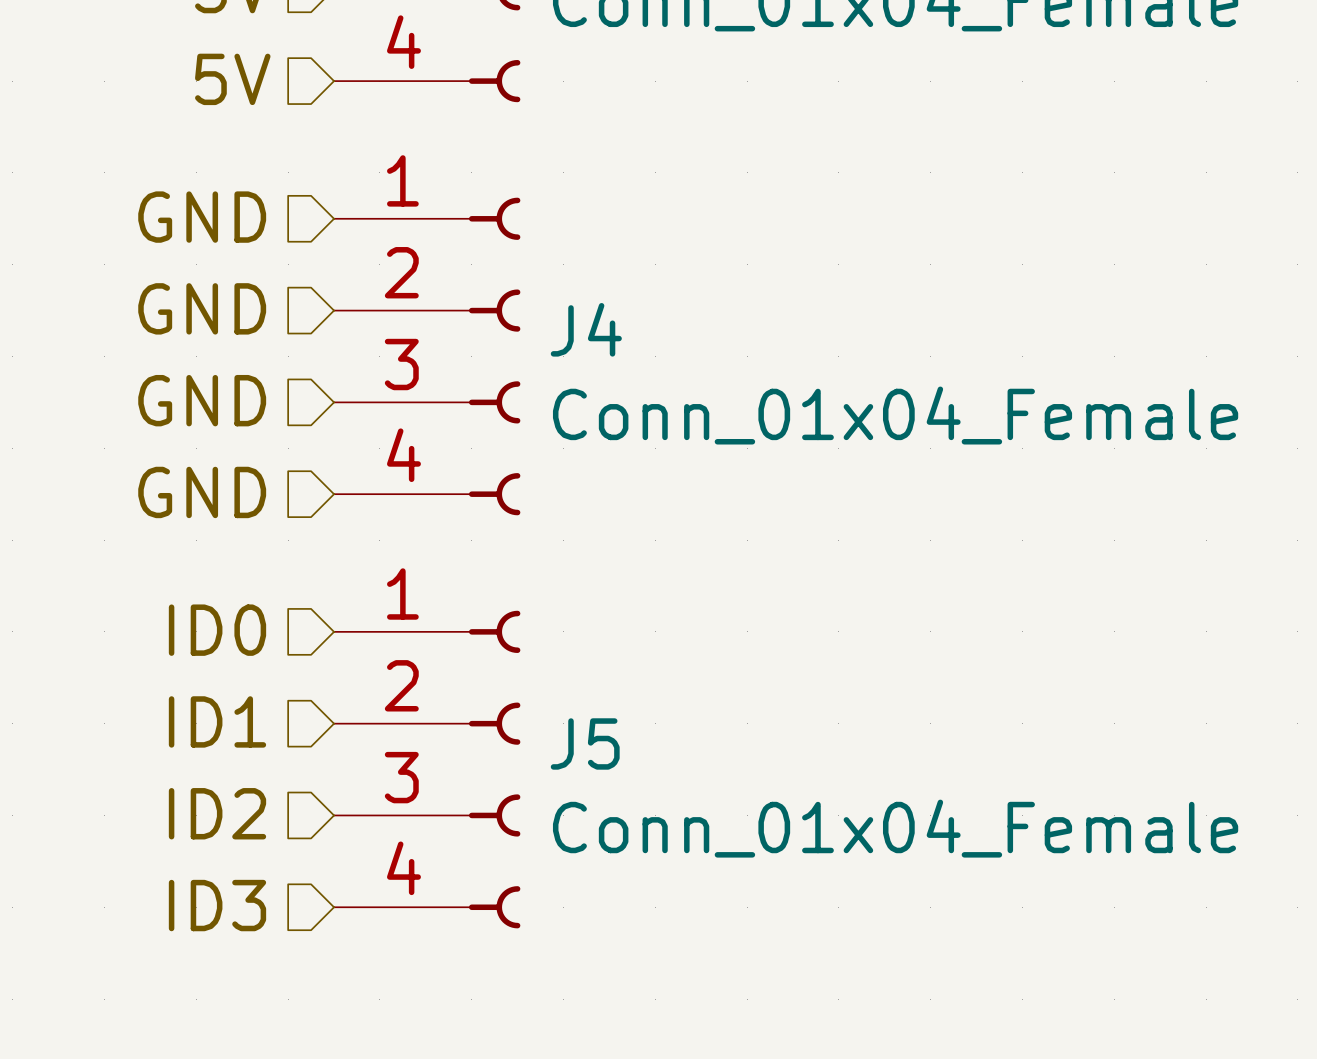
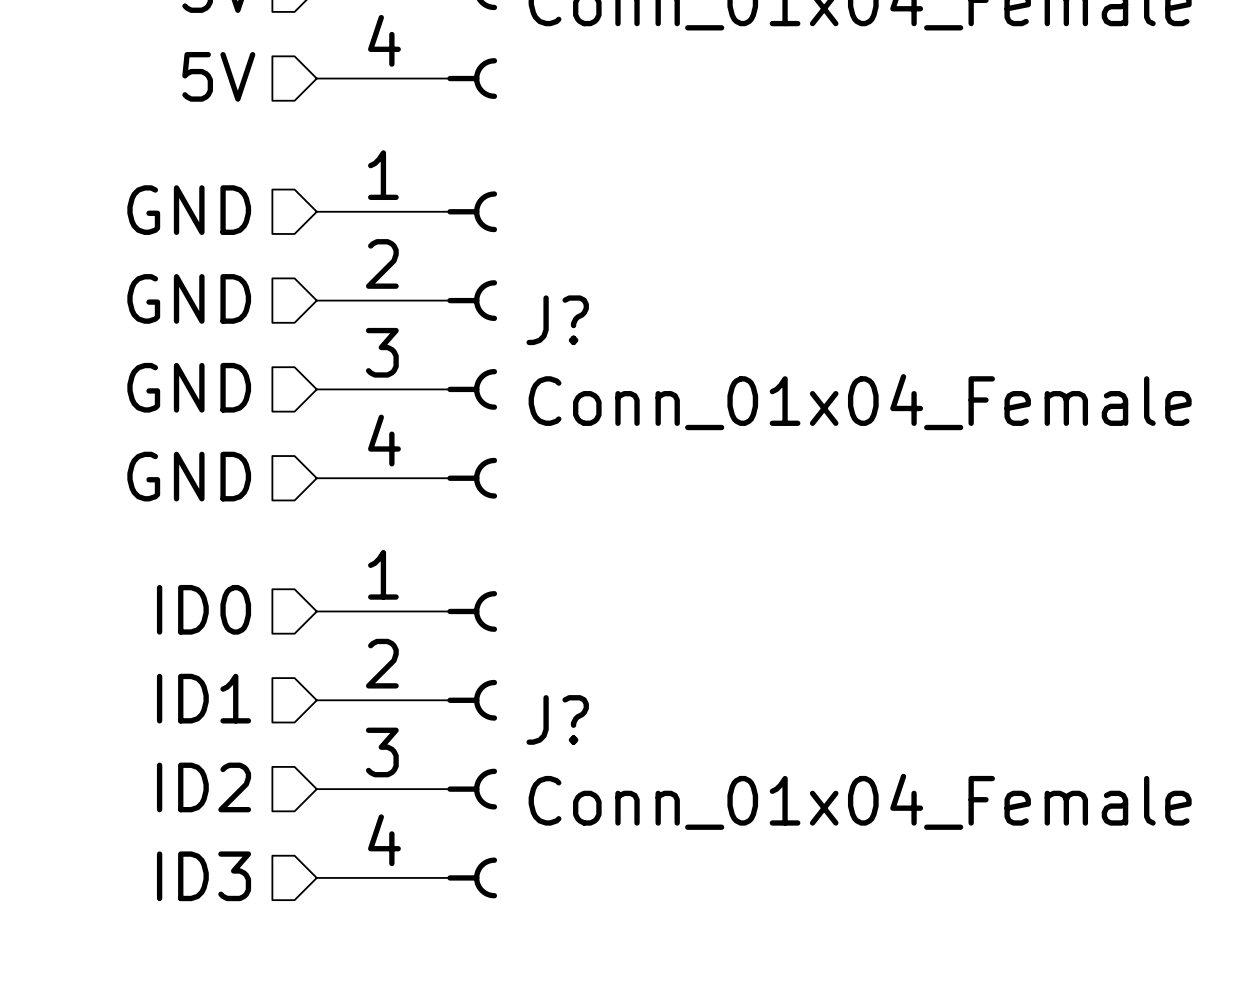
J4 name: J4 (586, 329) -> J? (557, 320)
J5 name: J5 (585, 743) -> J? (557, 719)

